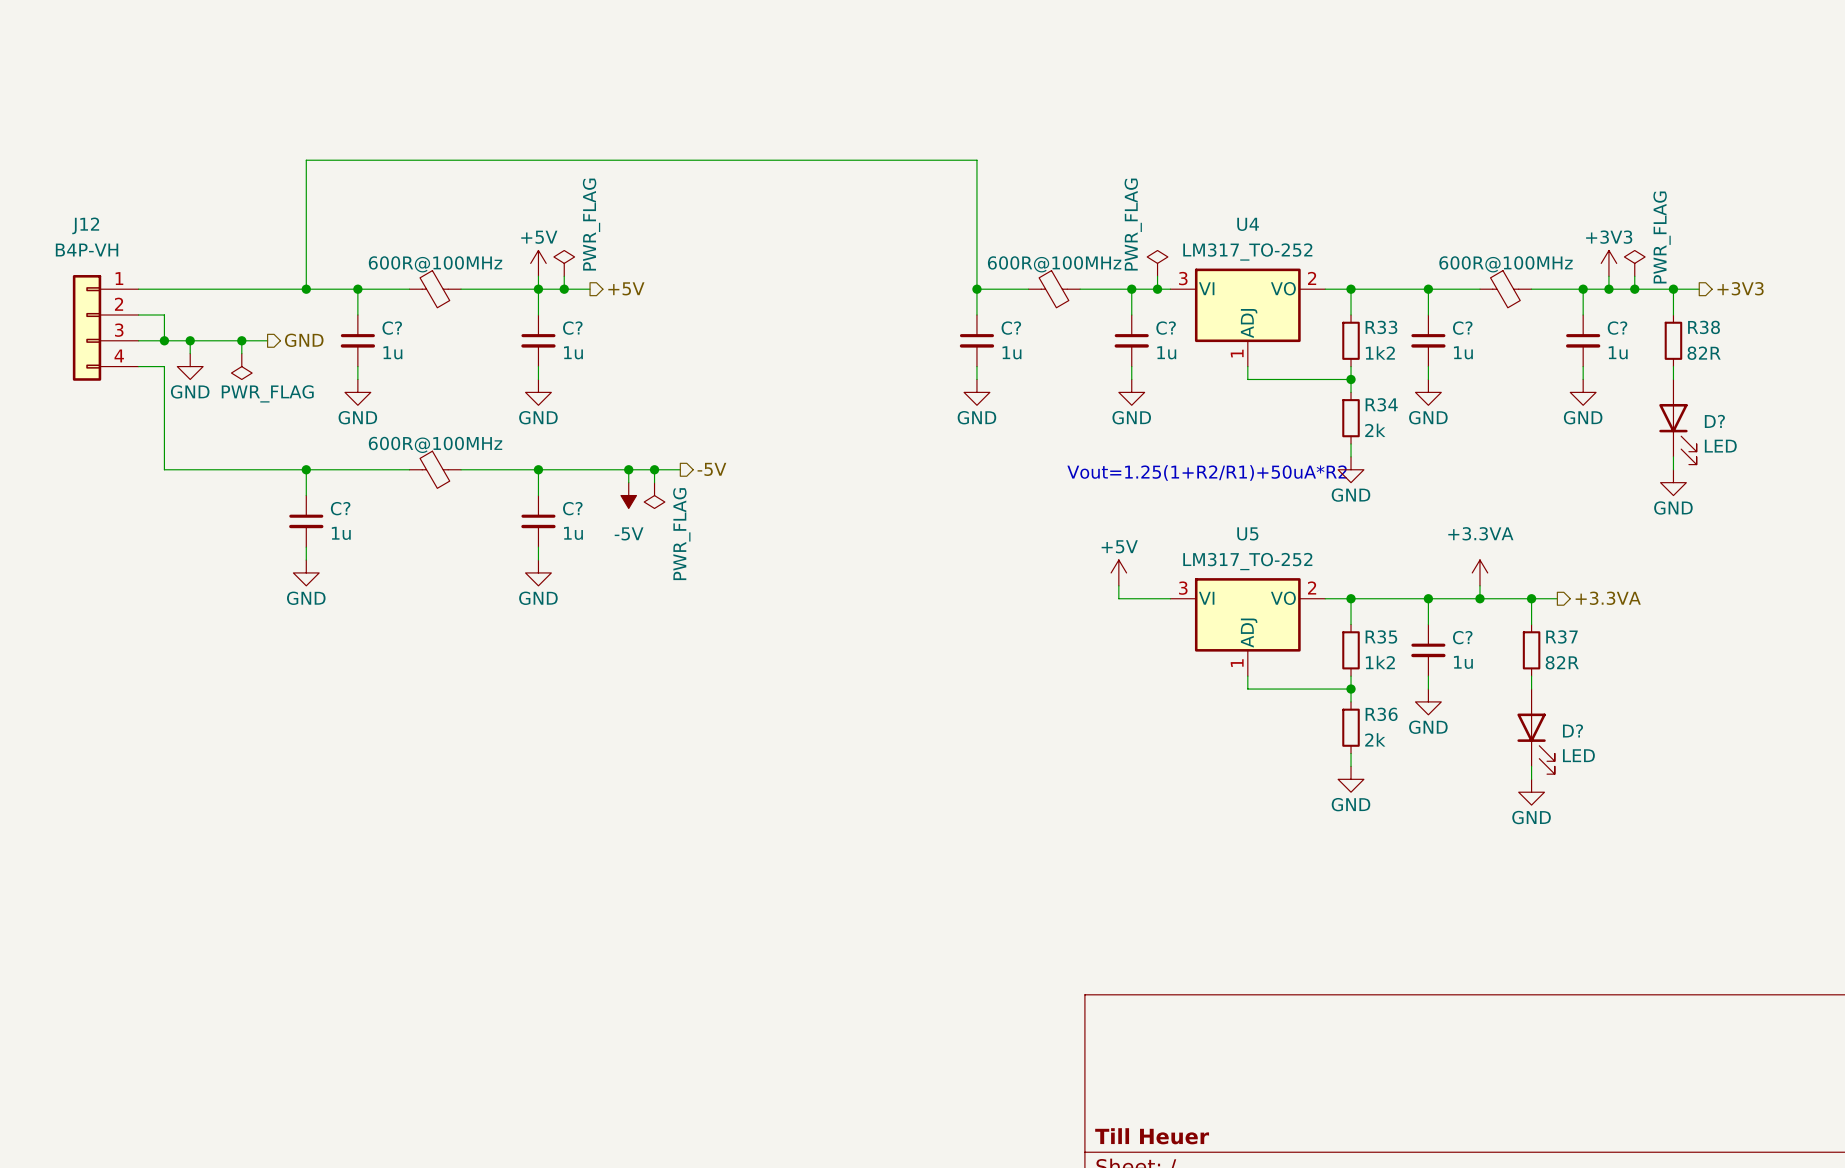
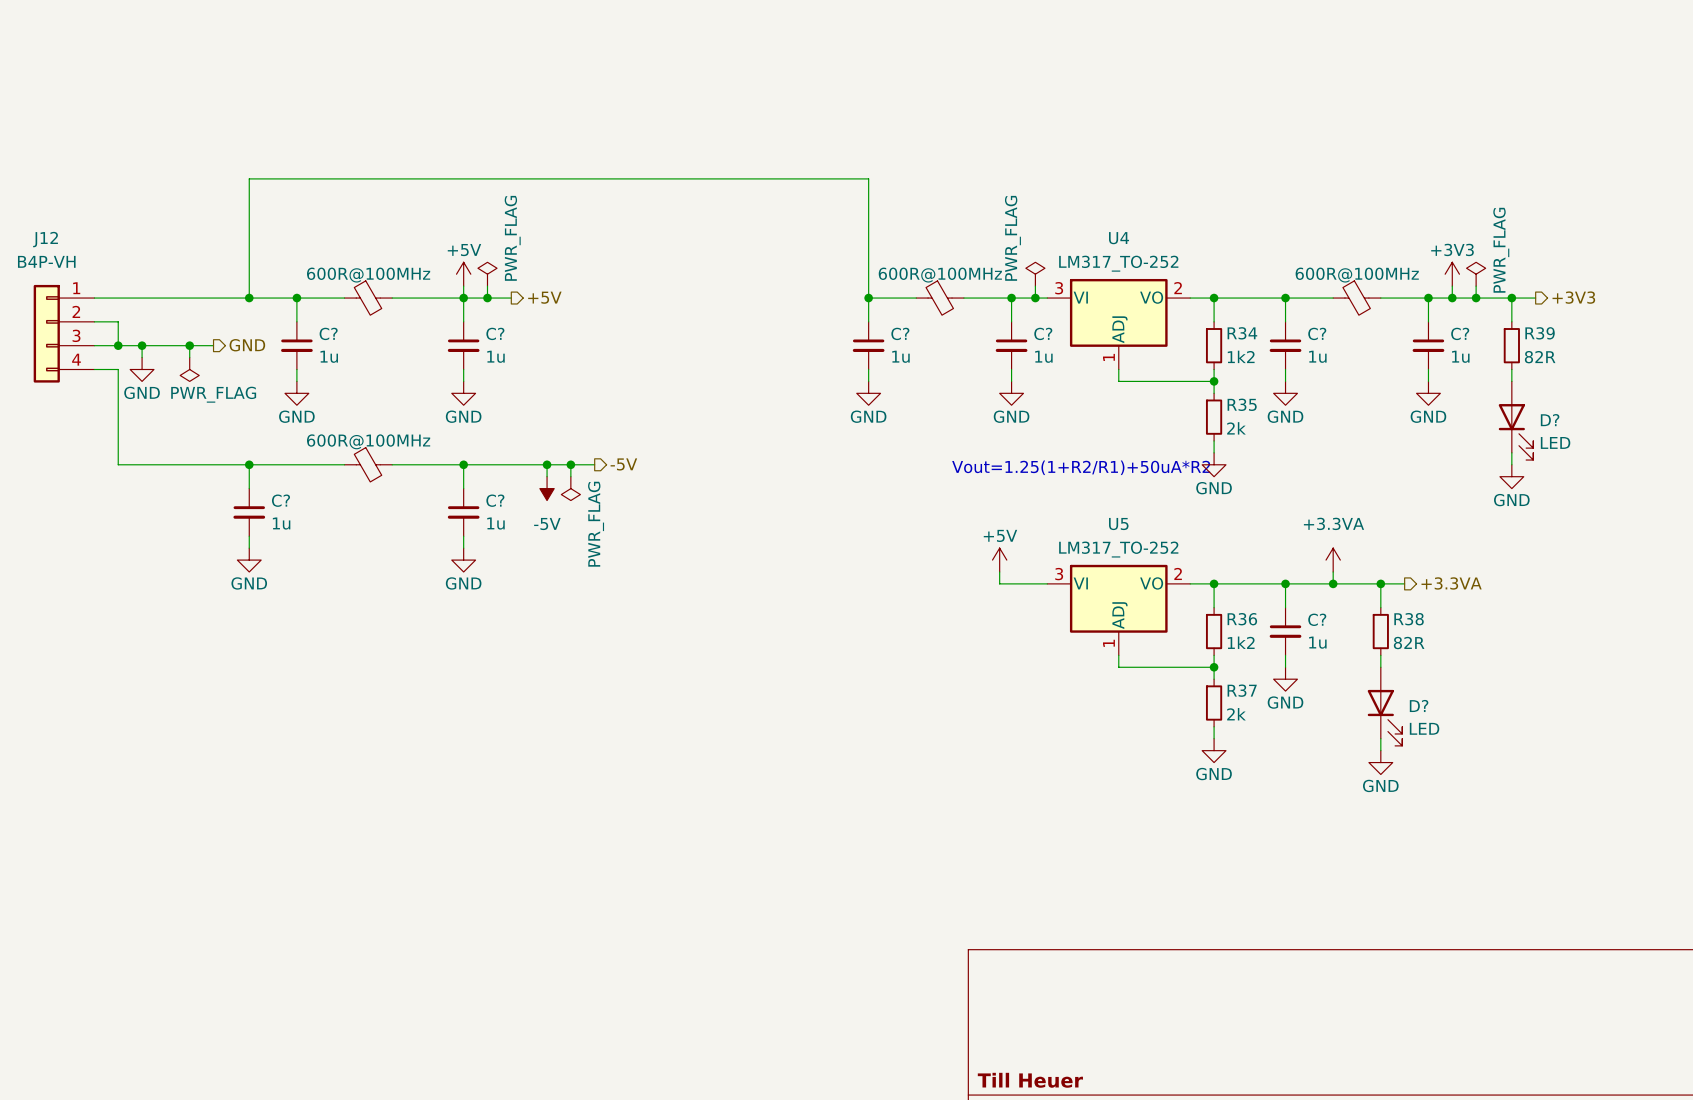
R33 name: R33 (1381, 327) -> R34 (1242, 333)
R38 name: R38 (1704, 327) -> R39 (1540, 333)
R34 name: R34 (1381, 404) -> R35 (1242, 404)
R35 name: R35 (1381, 636) -> R36 (1242, 619)
R37 name: R37 (1561, 636) -> R38 (1409, 619)
R36 name: R36 (1381, 714) -> R37 (1242, 690)

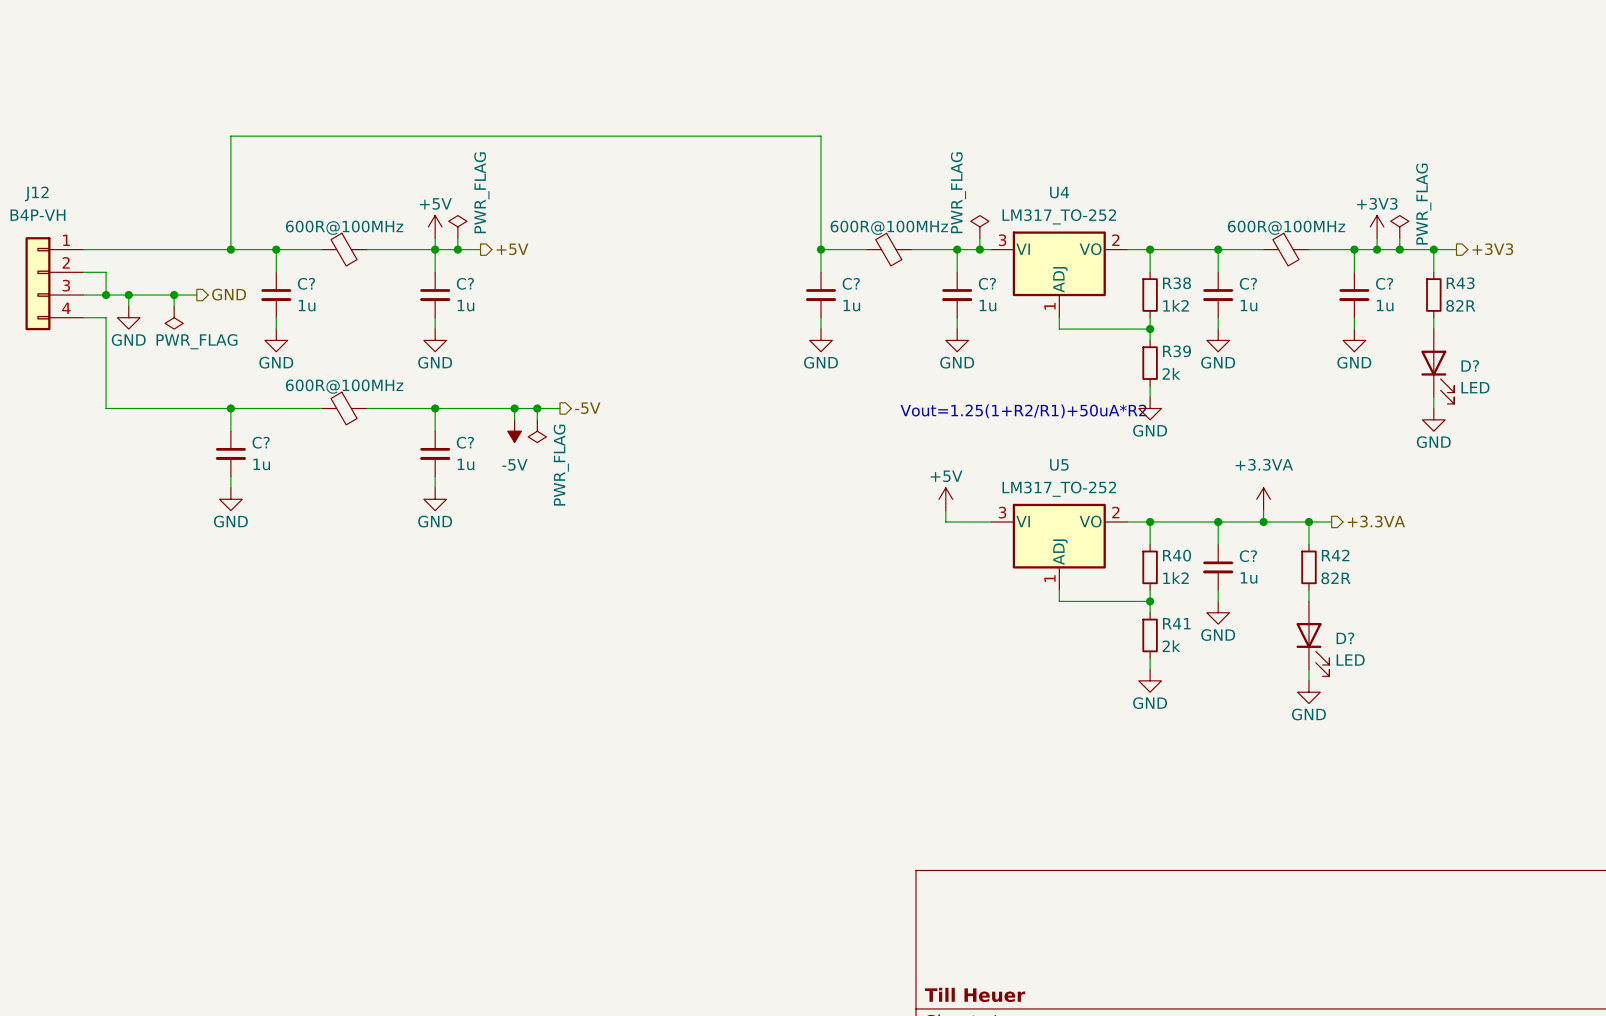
R34 name: R34 (1242, 333) -> R38 (1176, 283)
R39 name: R39 (1540, 333) -> R43 (1460, 283)
R35 name: R35 (1242, 404) -> R39 (1176, 351)
R36 name: R36 (1242, 619) -> R40 (1177, 555)
R38 name: R38 (1409, 619) -> R42 (1335, 555)
R37 name: R37 (1242, 690) -> R41 (1176, 623)

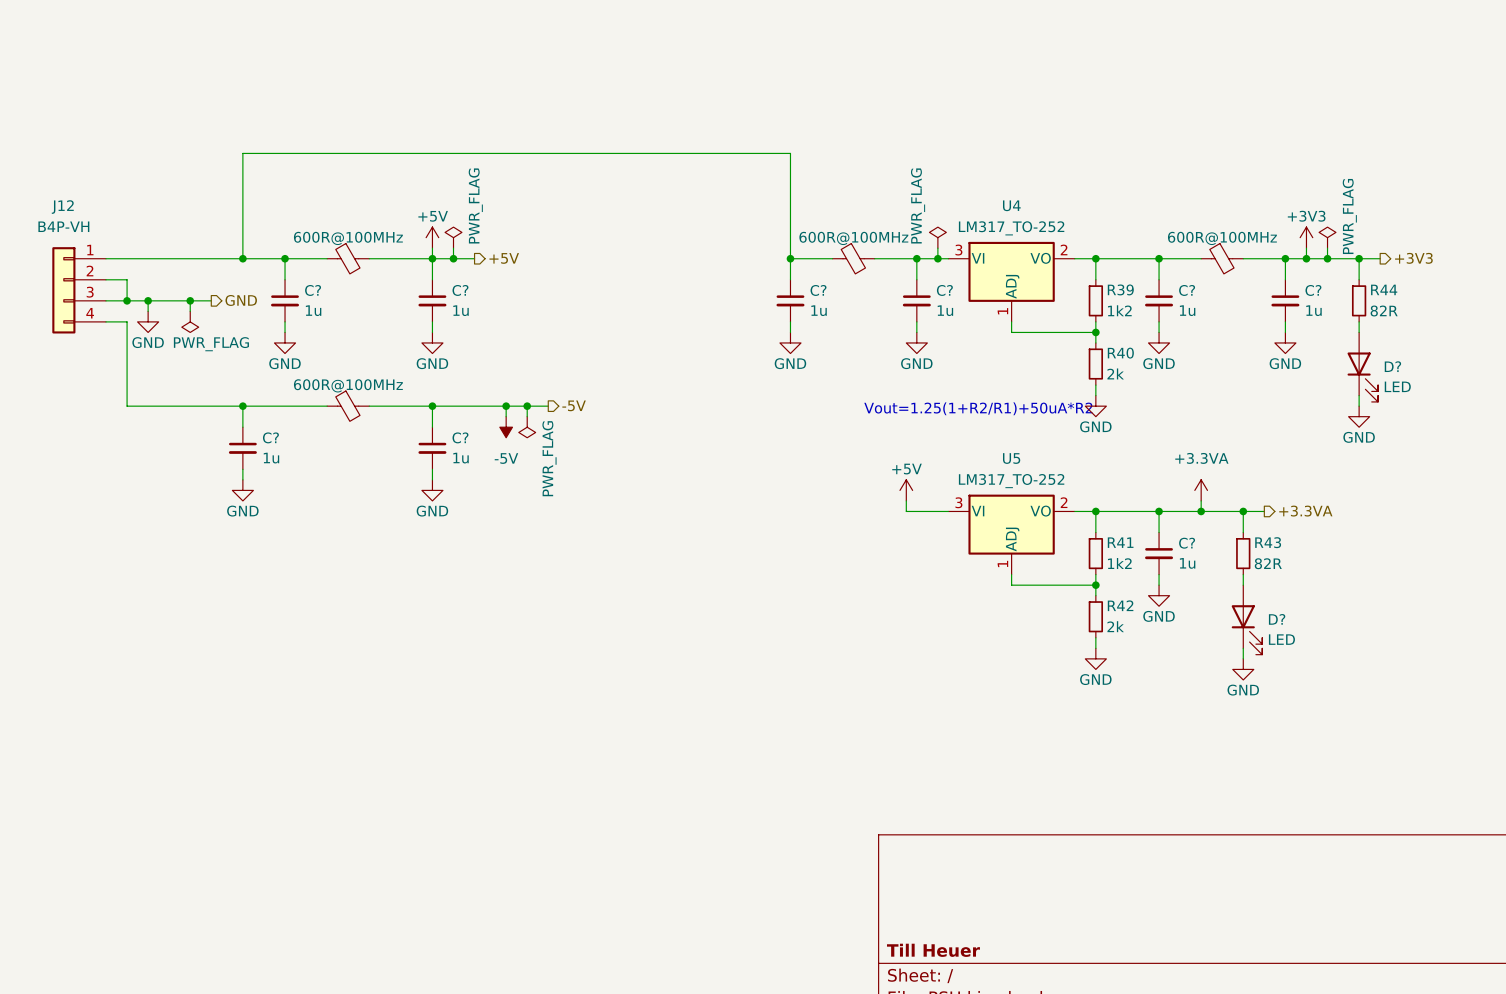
R38 name: R38 (1176, 283) -> R39 (1120, 289)
R43 name: R43 (1460, 283) -> R44 (1384, 289)
R39 name: R39 (1176, 351) -> R40 (1120, 353)
R40 name: R40 (1177, 555) -> R41 (1120, 542)
R42 name: R42 (1335, 555) -> R43 (1268, 542)
R41 name: R41 (1176, 623) -> R42 (1120, 605)

